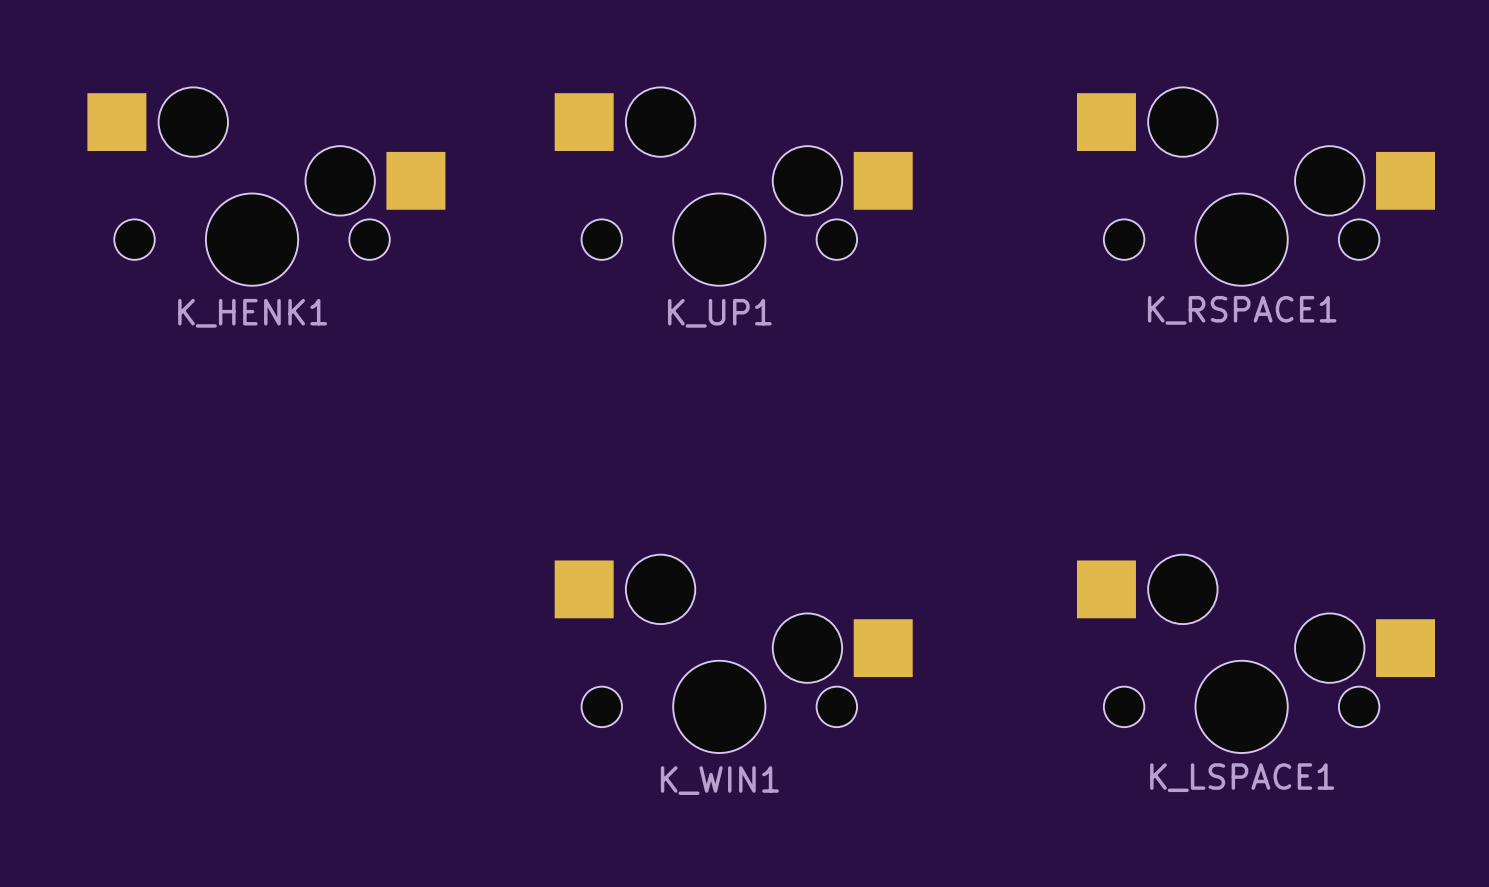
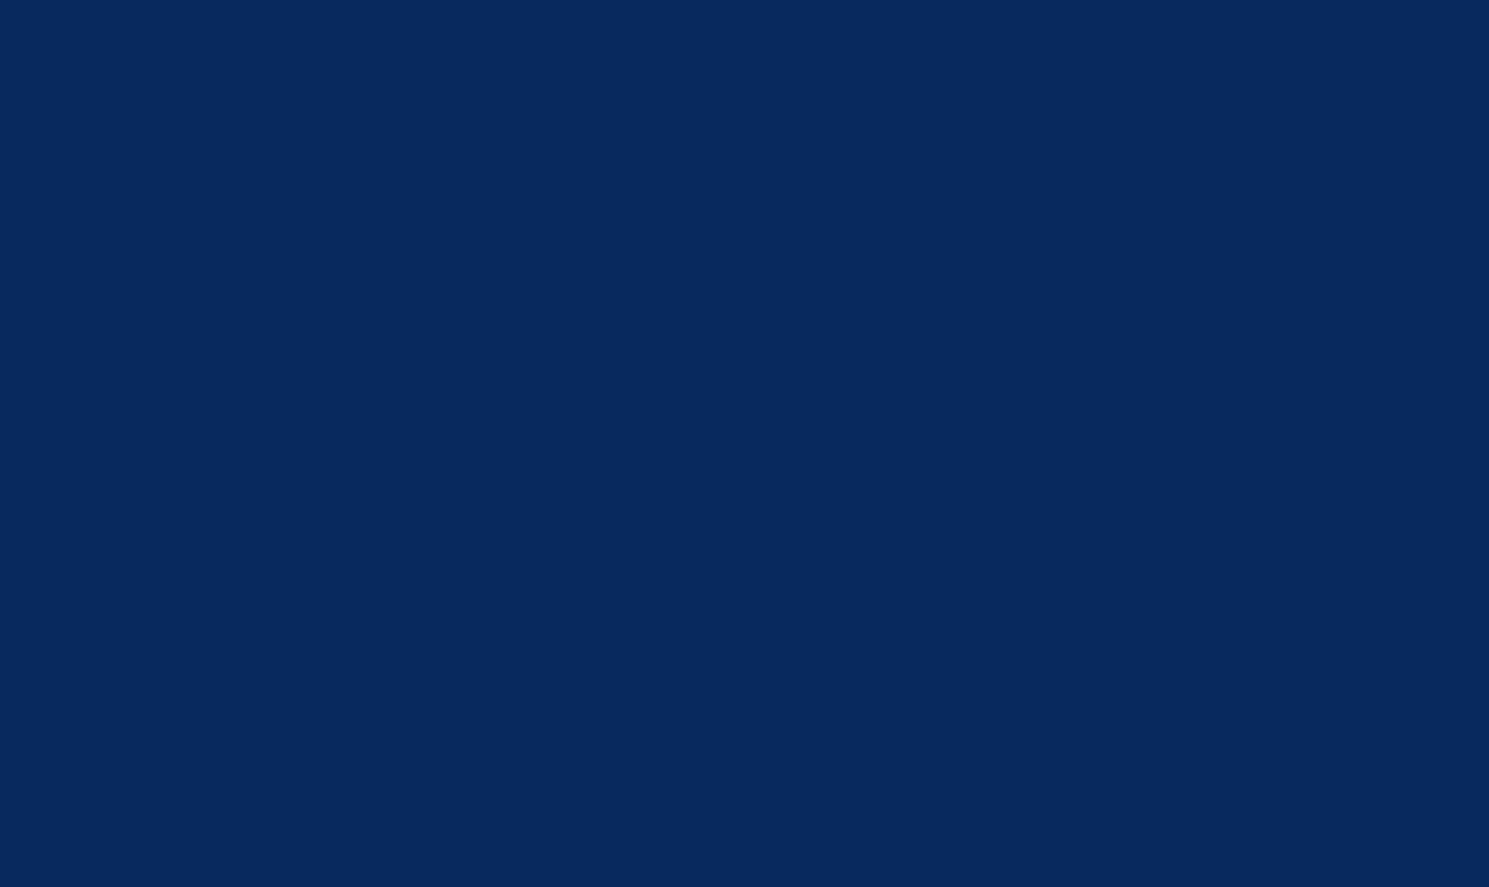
K_HENK1: (266, 186) -> none
K_UP1: (733, 186) -> none
K_RSPACE1: (1256, 186) -> none
K_WIN1: (733, 653) -> none
K_LSPACE1: (1256, 653) -> none

